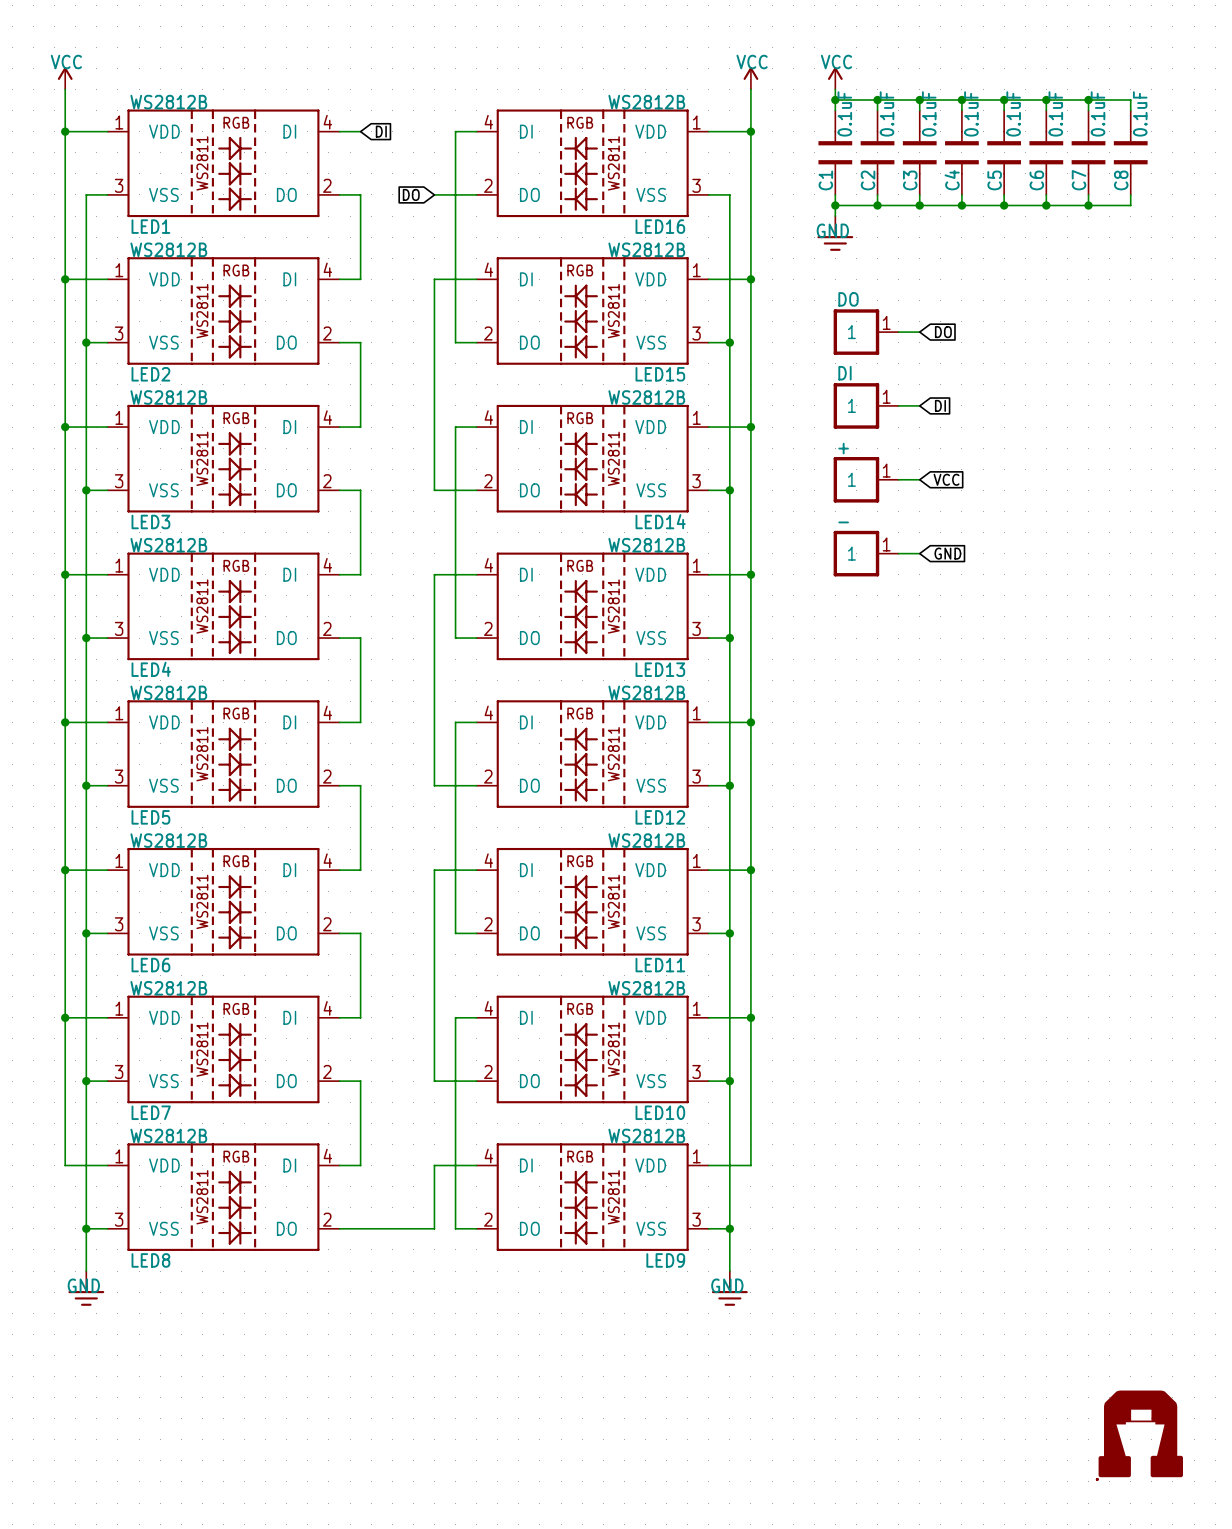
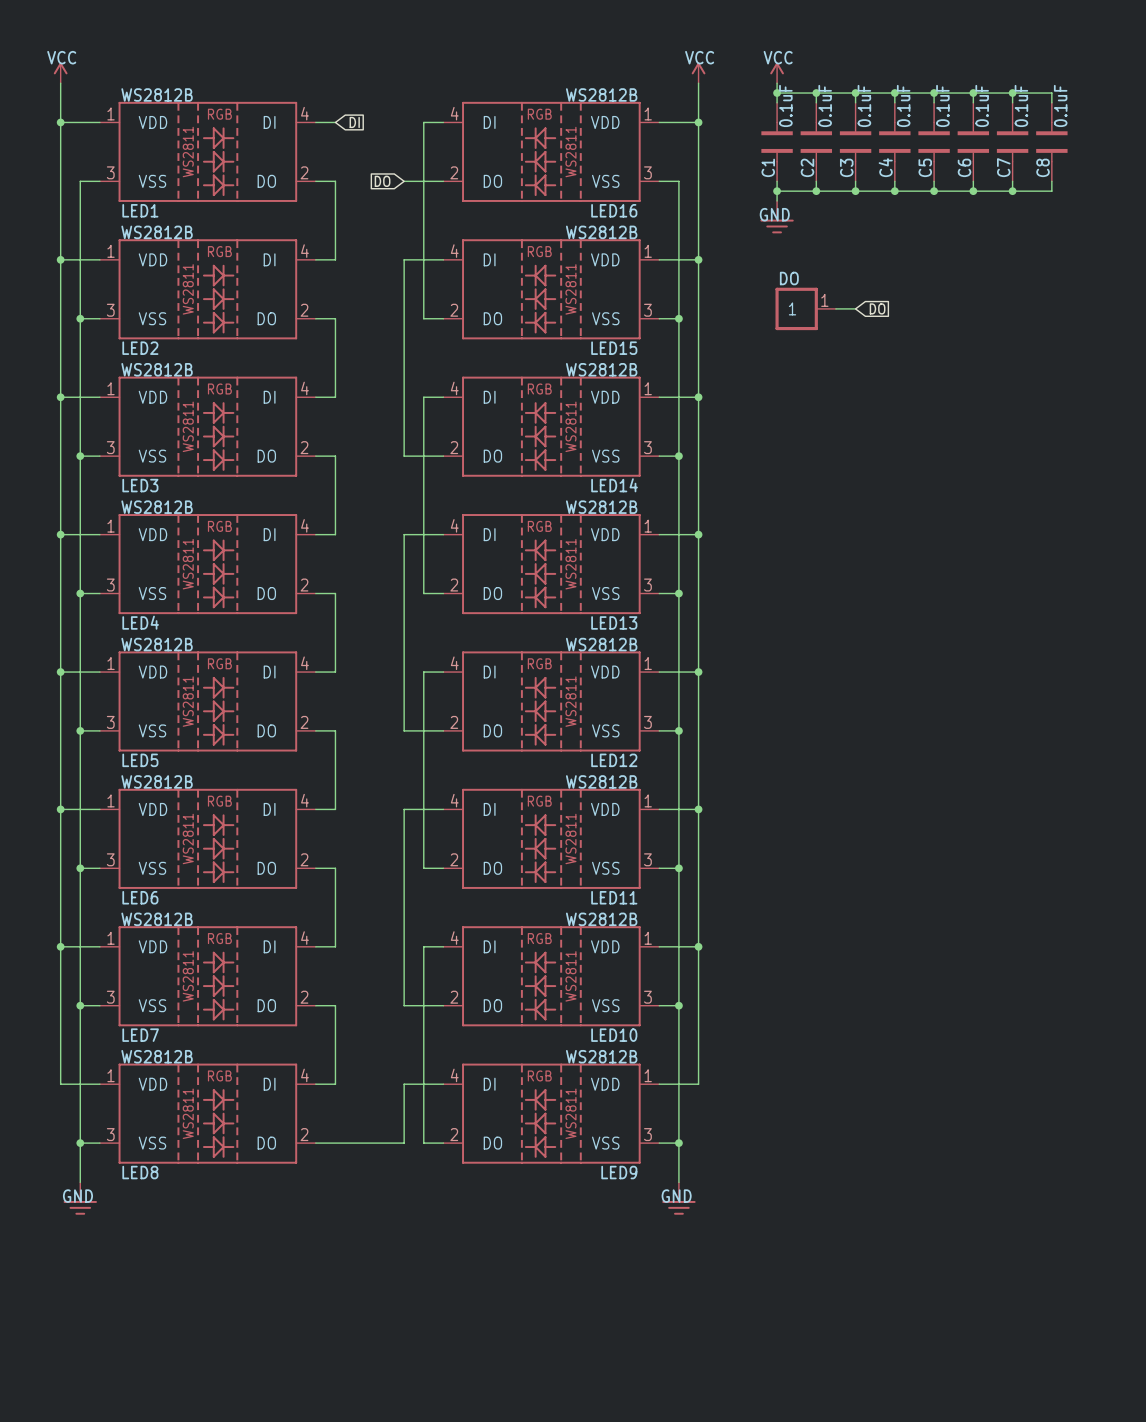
DI: (866, 405) -> none
wire: (898, 405) (919, 405) -> none
global label: DI (940, 405) -> none
part: (866, 479) -> none
wire: (898, 479) (919, 479) -> none
global label: VCC (946, 479) -> none
part: (866, 553) -> none
wire: (898, 553) (919, 553) -> none
global label: GND (947, 553) -> none
part: (1140, 1433) -> none

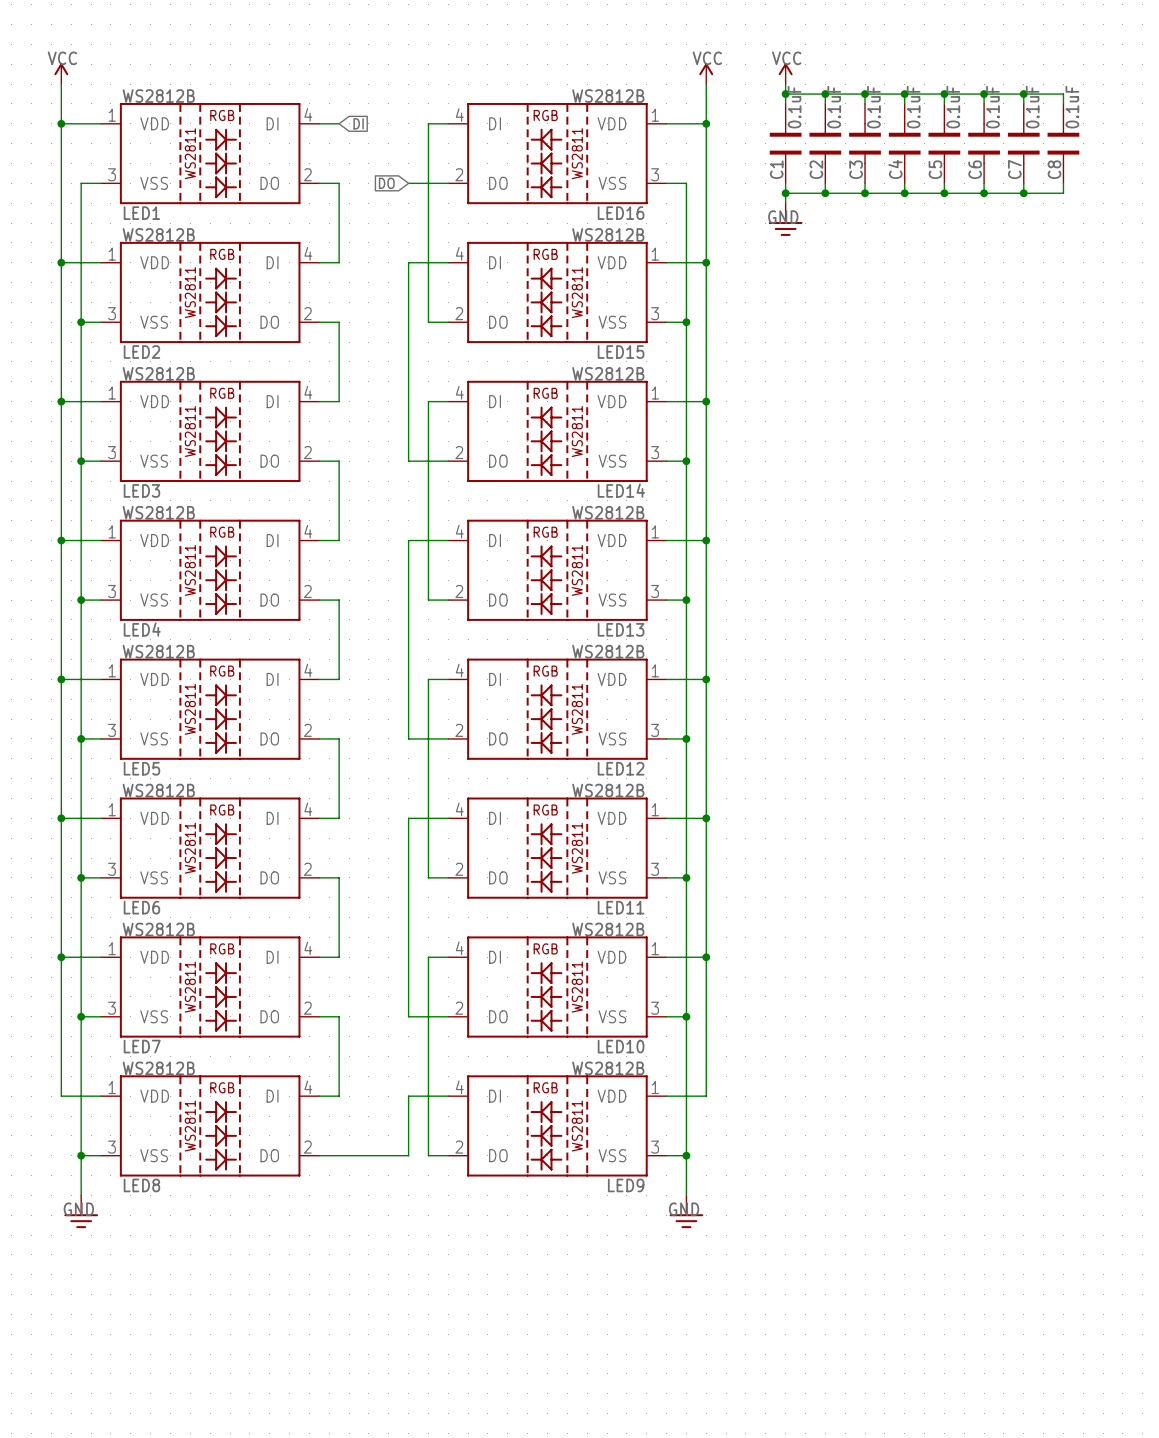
DO: (805, 308) -> none
wire: (835, 308) (855, 308) -> none
global label: DO (877, 308) -> none

